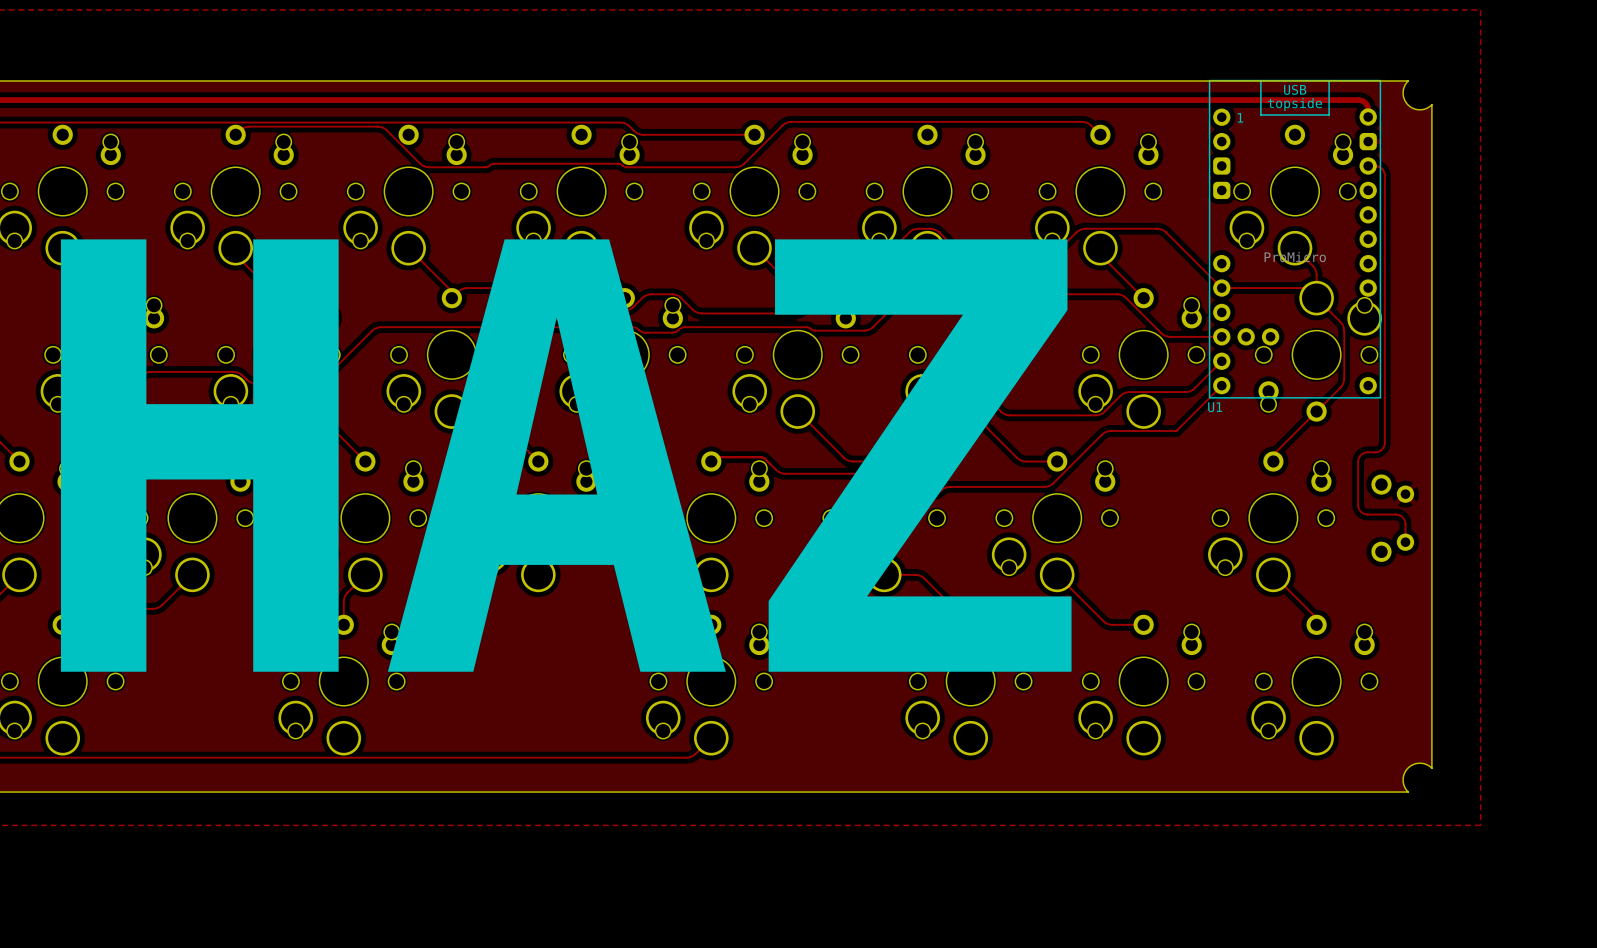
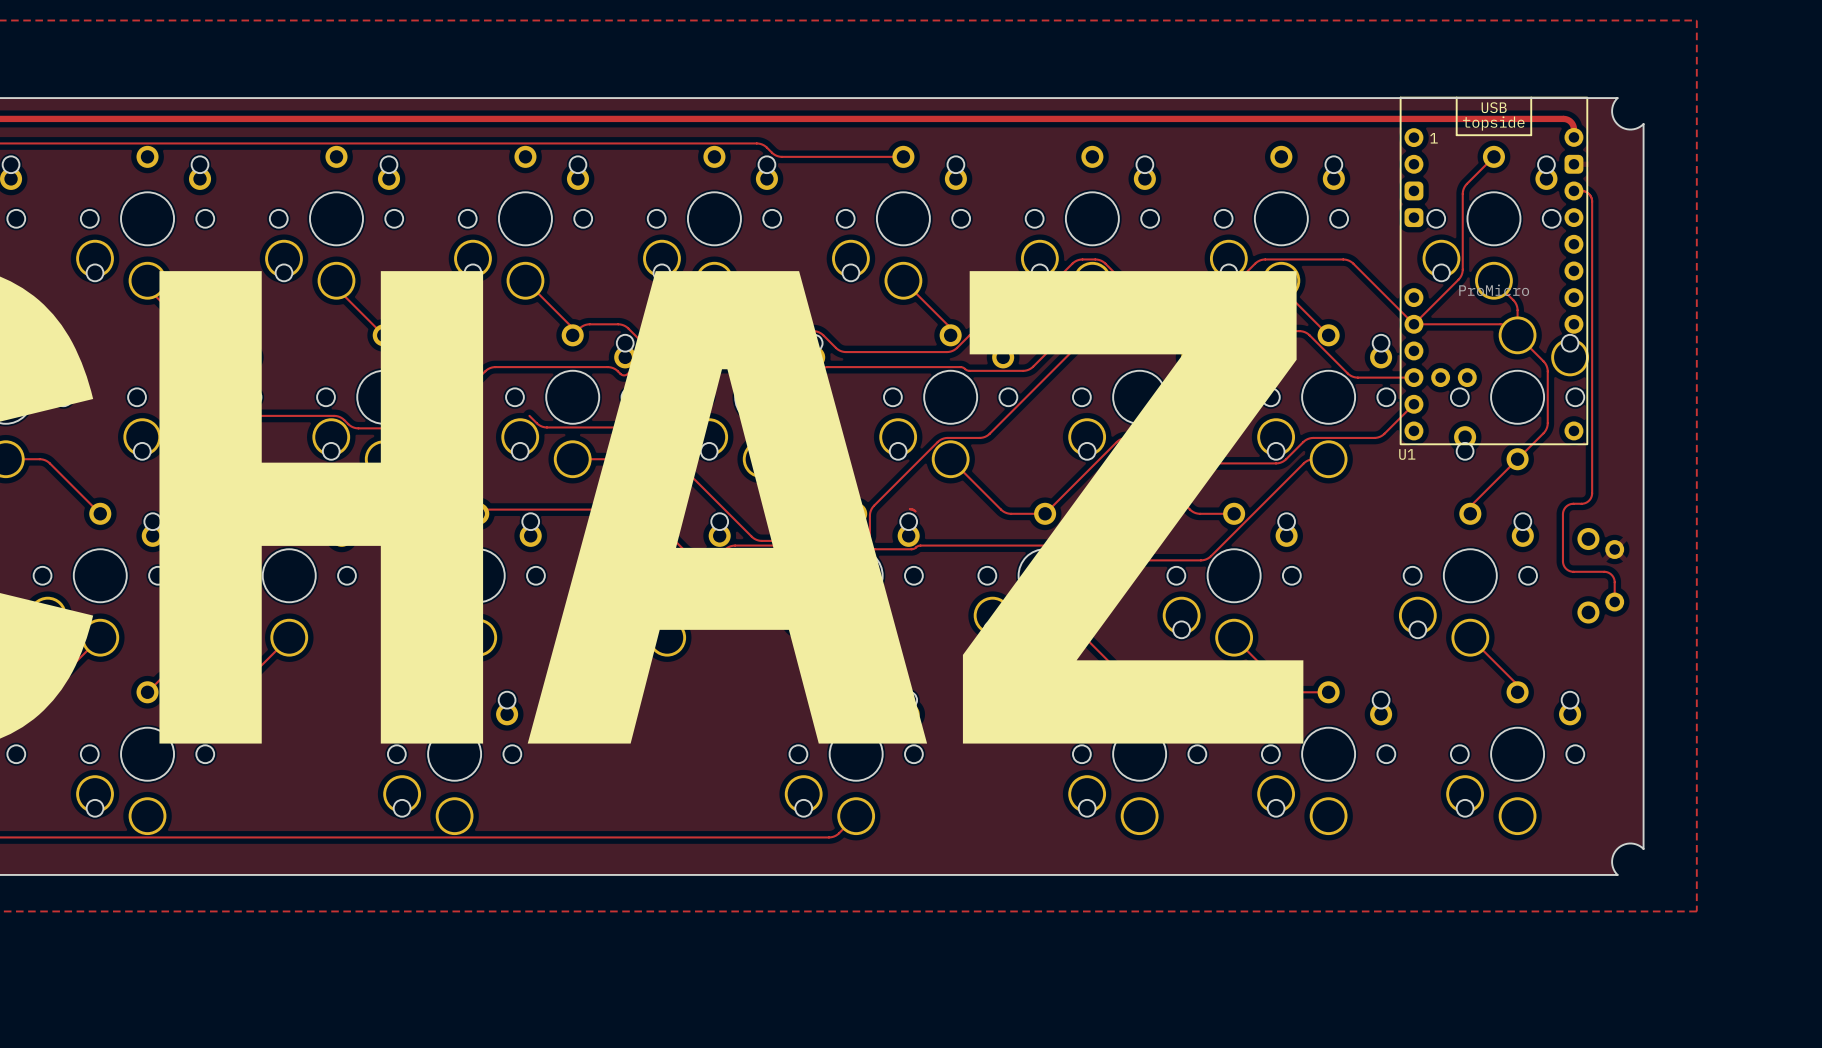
track: (235, 134) (242, 128) (249, 126) (379, 126) (386, 130) (420, 164) (429, 167) (486, 167) (494, 163) (618, 163) (627, 167) (737, 167) (744, 163) (783, 124) (791, 121) (1082, 121) (1090, 124) (1100, 134) -> none
track: none -> (1493, 156) (1466, 183) (1463, 190) (1461, 275) (1413, 324)
track: none -> (1092, 301) (1092, 327) (1088, 335) (988, 434) (981, 437) (945, 438) (937, 442) (872, 507) (870, 513) (869, 537) (866, 540) (756, 539) (643, 429) (636, 427) (545, 427) (539, 425) (529, 415)
track: (1221, 385) (1176, 430) (1111, 431) (1104, 432) (1053, 483) (1046, 486) (948, 486) (935, 493) (908, 493) (901, 490) (881, 474) (784, 473) (777, 470) (765, 459) -> none
track: none -> (1313, 459) (1303, 463) (1210, 556) (1200, 560) (1076, 560) (1070, 557) (1058, 547) (1051, 545) (920, 545) (911, 549) (874, 549) (866, 545) (735, 545) (718, 553) (692, 554) (685, 551) (647, 513) (641, 510) (485, 509)
track: (718, 457) (760, 457) -> none

